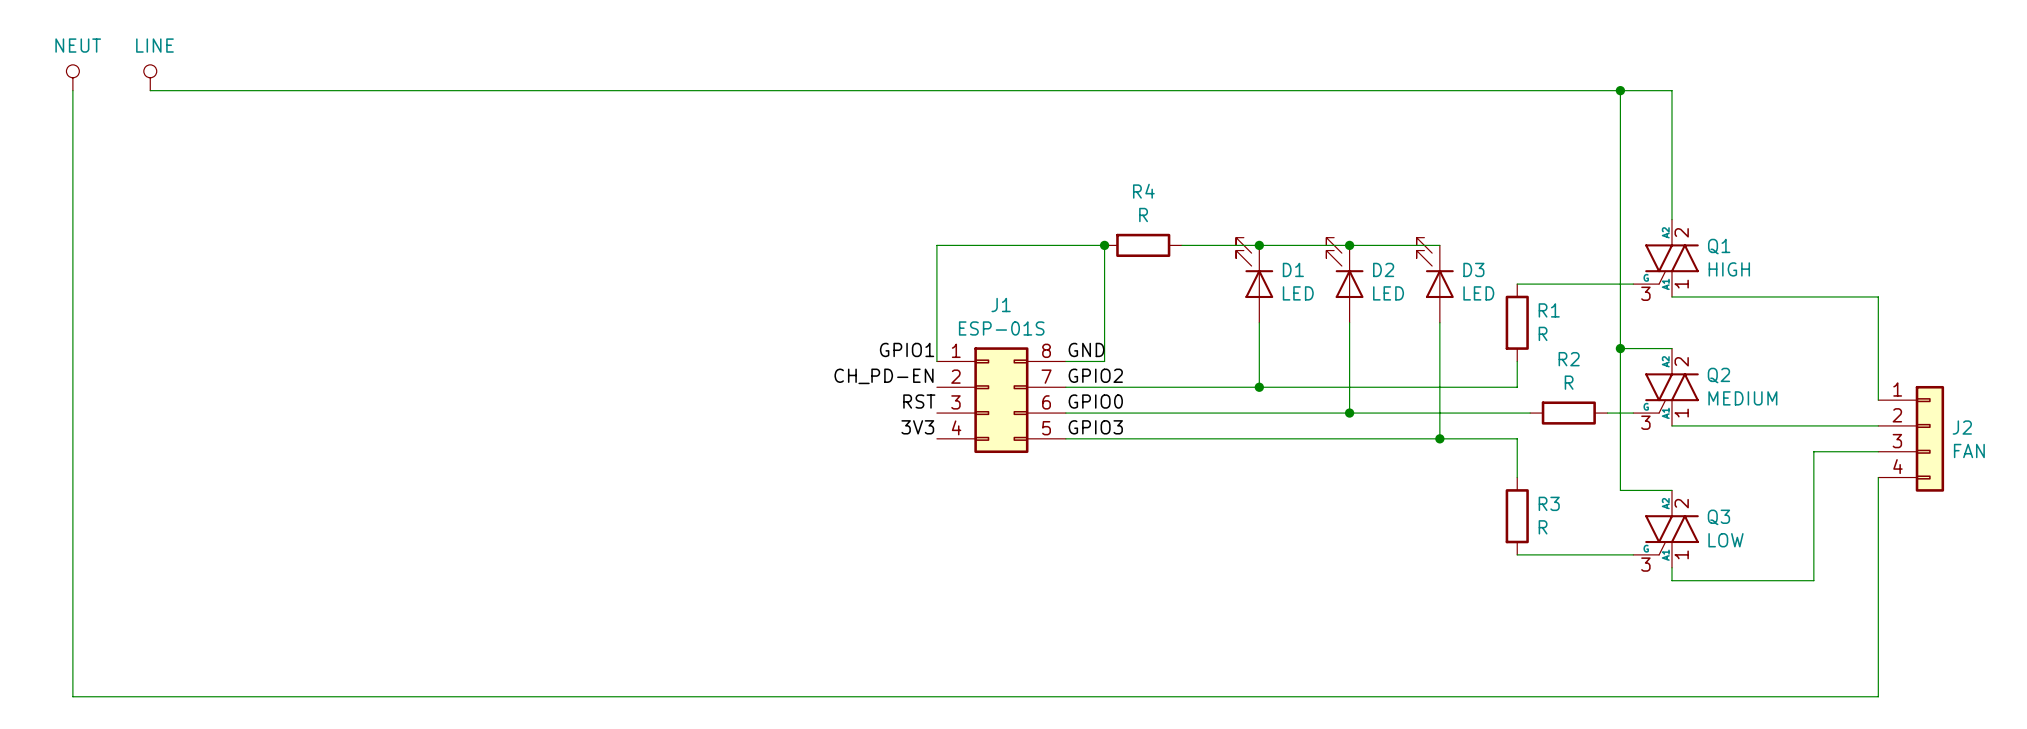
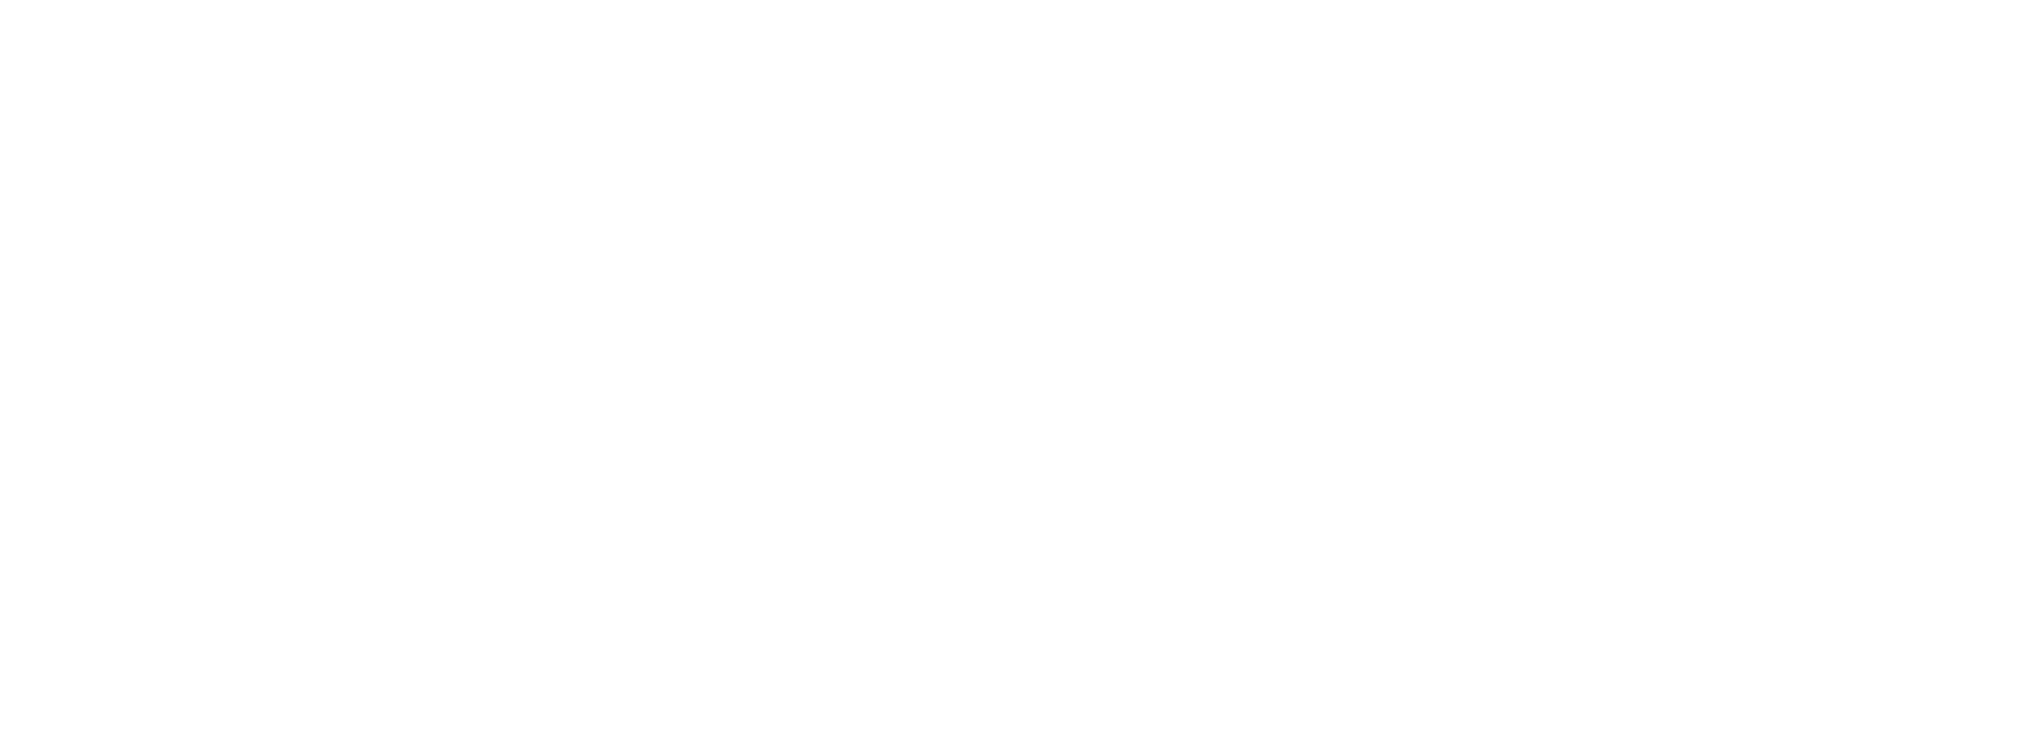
power symbol: NEUT (72, 77) -> none
power symbol: LINE (150, 77) -> none
wire: (72, 90) (72, 696) (1878, 696) (1878, 477) -> none
wire: (150, 90) (1671, 90) (1671, 219) -> none
wire: (1620, 90) (1620, 490) (1671, 490) -> none
junction: (1620, 90) -> none
junction: (1104, 245) -> none
R4: R (1143, 245) -> none
wire: (1181, 245) (1439, 245) -> none
junction: (1259, 245) -> none
junction: (1349, 245) -> none
Q1: HIGH (1666, 258) -> none
D1: LED (1254, 280) -> none
D2: LED (1344, 280) -> none
D3: LED (1435, 280) -> none
wire: (1517, 284) (1633, 284) -> none
wire: (1671, 296) (1878, 296) (1878, 400) -> none
wire: (1259, 322) (1259, 387) -> none
wire: (1349, 322) (1349, 413) -> none
wire: (1439, 322) (1439, 438) -> none
R1: R (1517, 322) -> none
wire: (1620, 348) (1671, 348) -> none
junction: (1620, 348) -> none
label: GPIO1 (907, 349) -> none
label: GND (1086, 349) -> none
wire: (936, 361) (936, 245) (1104, 245) (1104, 361) (1065, 361) -> none
wire: (1517, 361) (1517, 387) (1065, 387) -> none
label: GPIO2 (1095, 375) -> none
label: CH_PD-EN (884, 376) -> none
junction: (1259, 387) -> none
Q2: MEDIUM (1666, 387) -> none
J1: ESP-01S (1001, 400) -> none
label: RST (919, 401) -> none
label: GPIO0 (1095, 401) -> none
wire: (1065, 413) (1530, 413) -> none
junction: (1349, 413) -> none
R2: R (1568, 413) -> none
wire: (1607, 413) (1633, 413) -> none
wire: (1671, 425) (1878, 425) -> none
label: 3V3 (917, 427) -> none
label: GPIO3 (1095, 427) -> none
wire: (1065, 438) (1517, 438) (1517, 477) -> none
junction: (1439, 438) -> none
J2: FAN (1911, 438) -> none
wire: (1878, 451) (1813, 451) (1813, 580) (1671, 580) (1671, 567) -> none
R3: R (1517, 516) -> none
Q3: LOW (1666, 529) -> none
wire: (1517, 554) (1633, 554) -> none

